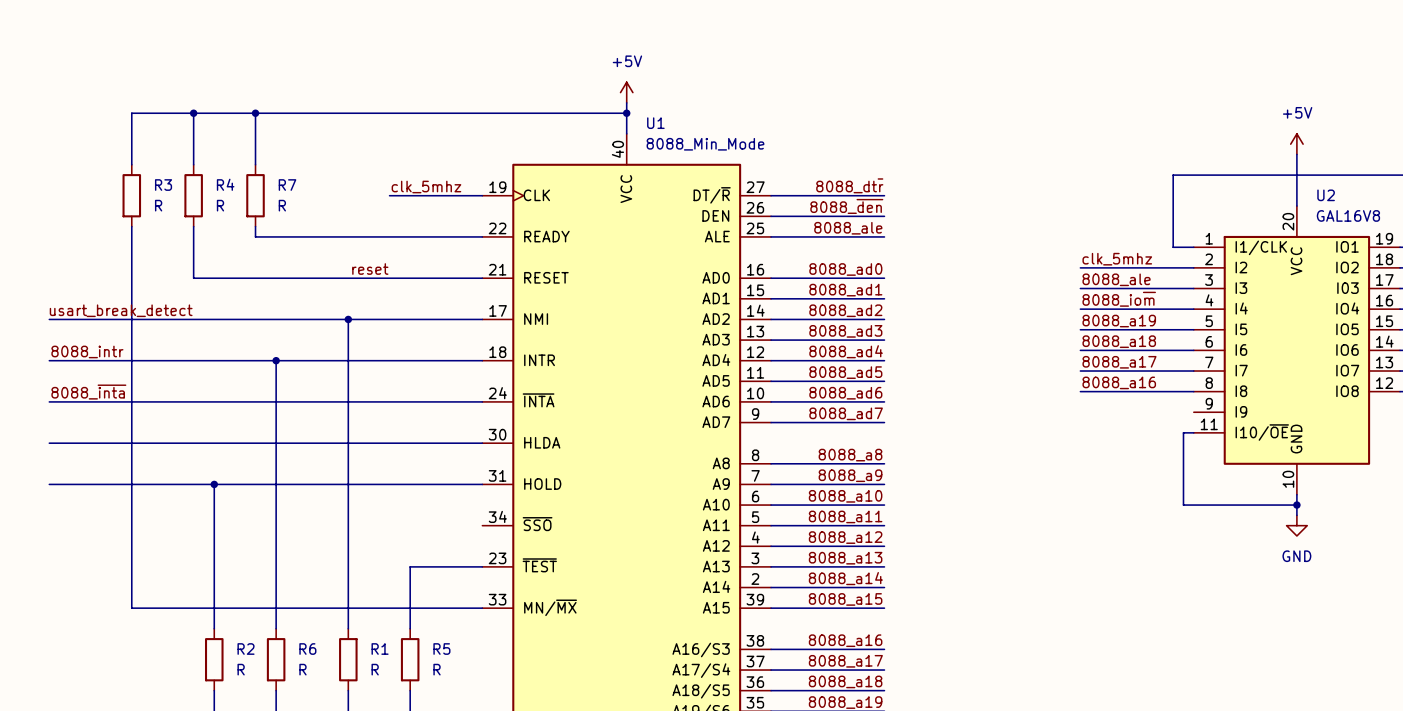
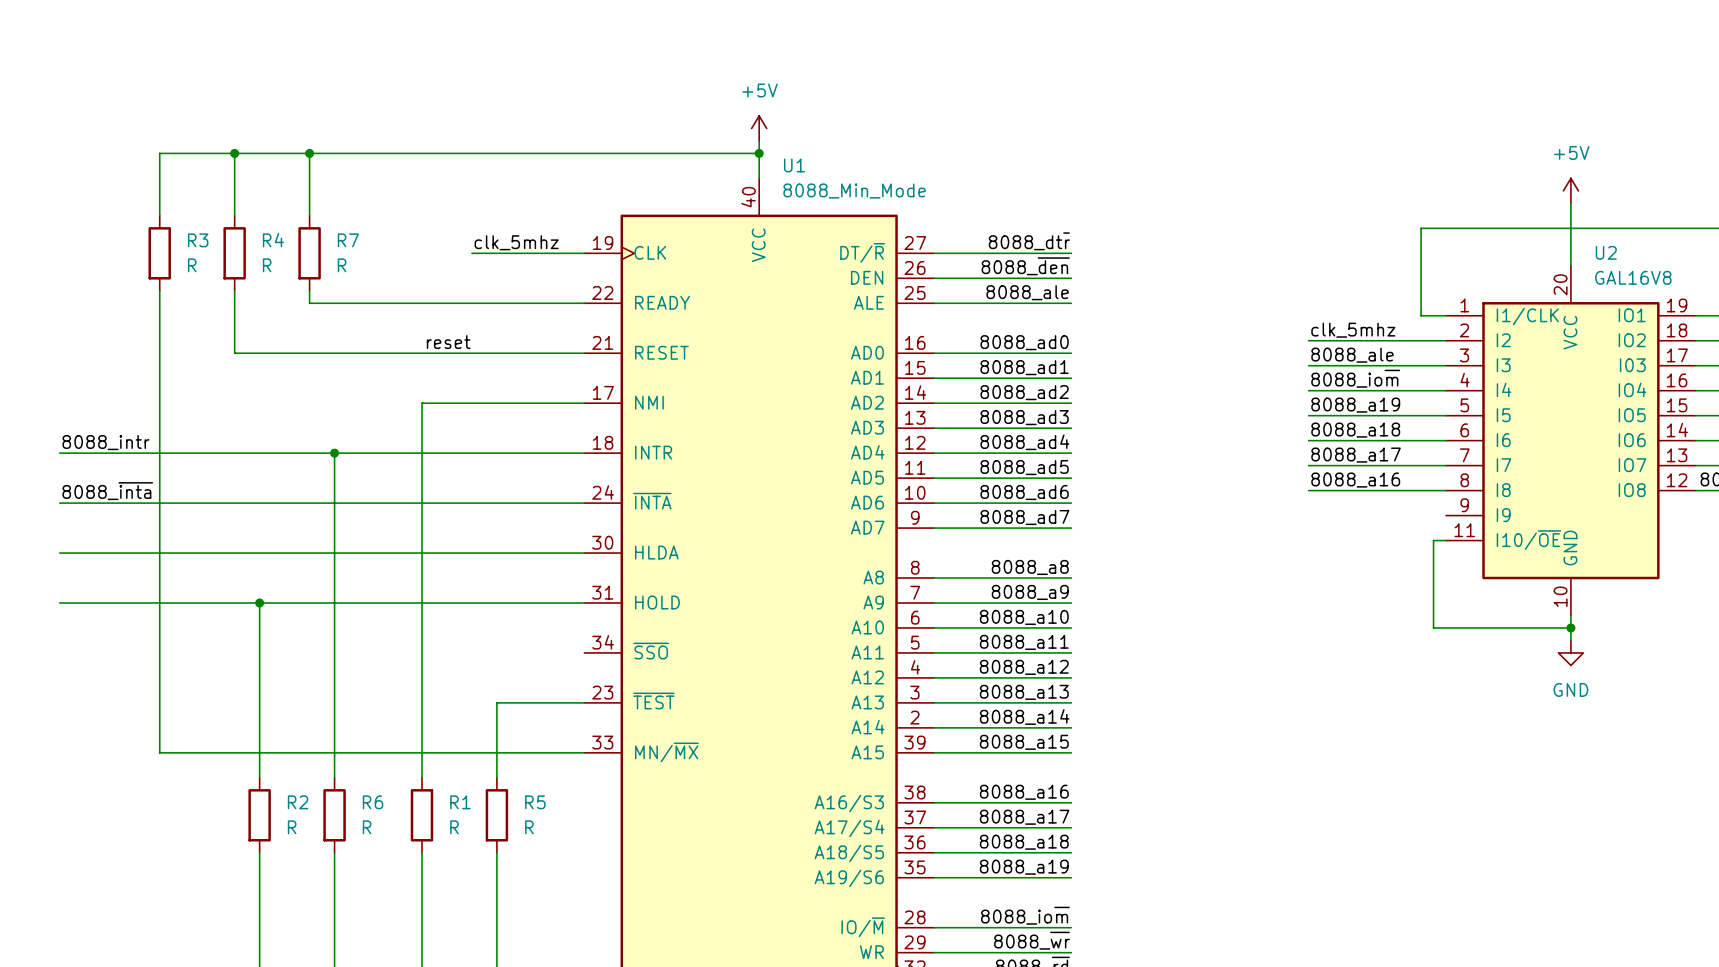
label: usart_break_detect (121, 310) -> none
wire: (49, 319) (348, 319) -> none
junction: (348, 319) -> none

